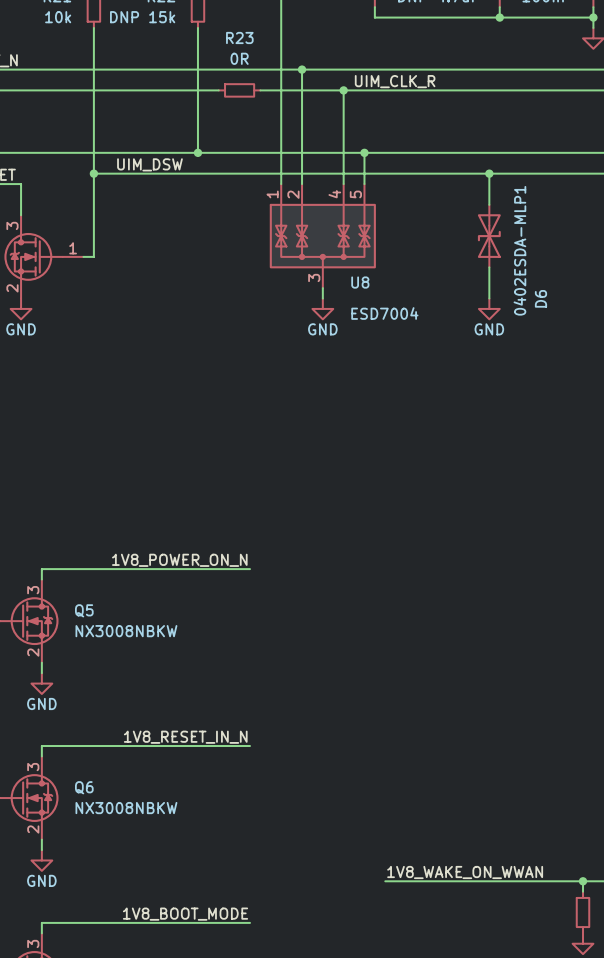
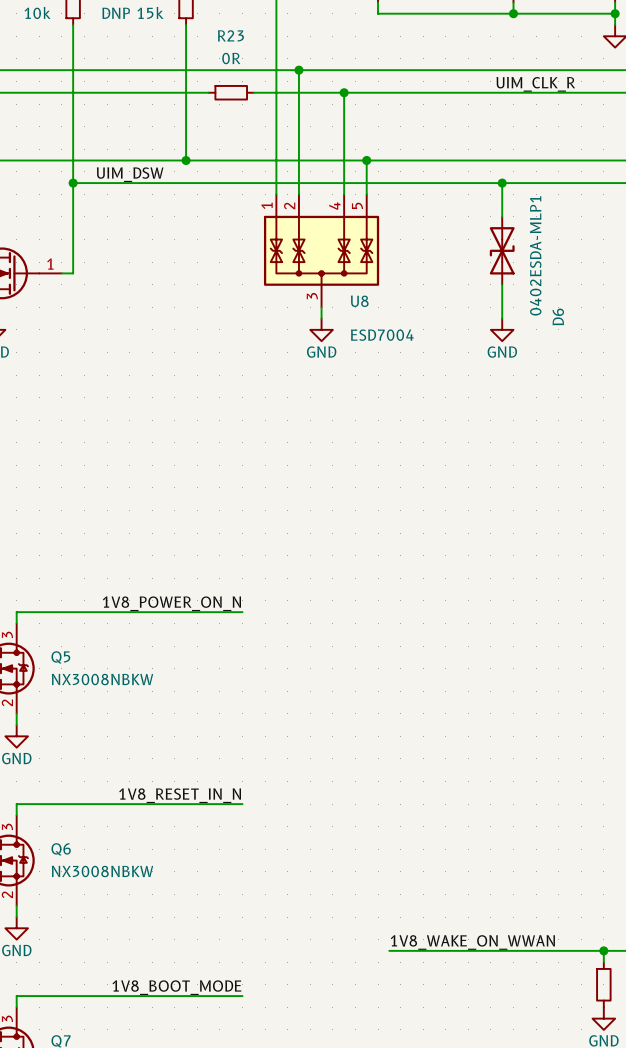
label position: UIM_CLK_R (395, 81) -> UIM_CLK_R (535, 84)

